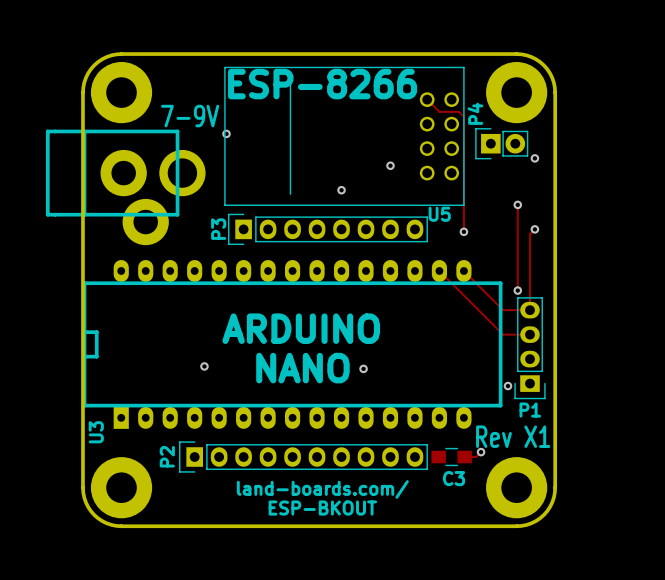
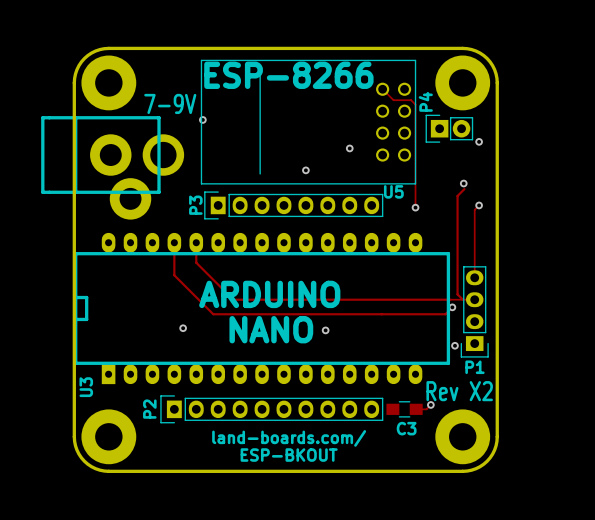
track: (517, 204) (517, 290) -> none
track: none -> (464, 189) (457, 196) (457, 294) (462, 299)
track: none -> (174, 242) (174, 275) (213, 314) (445, 314) (452, 307)
track: (439, 270) (503, 334) -> (196, 242) (196, 262) (233, 299) (450, 299)
track: (463, 270) (503, 310) (530, 310) -> none
via position: (517, 290) -> (452, 307)
text: Rev X1 (513, 436) -> Rev X2 (459, 391)

